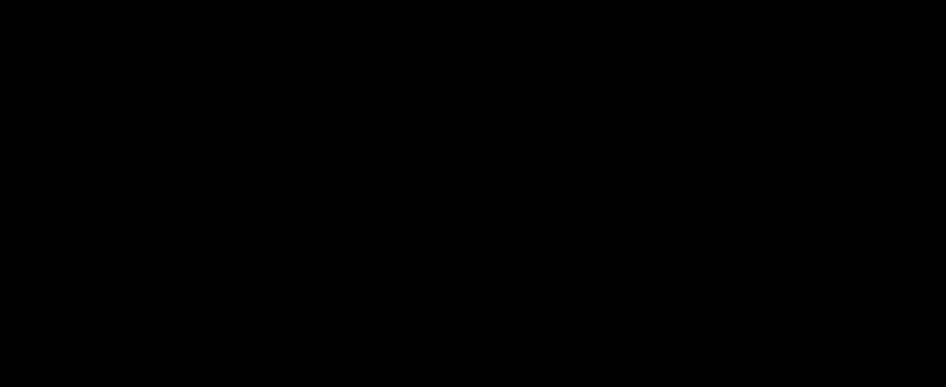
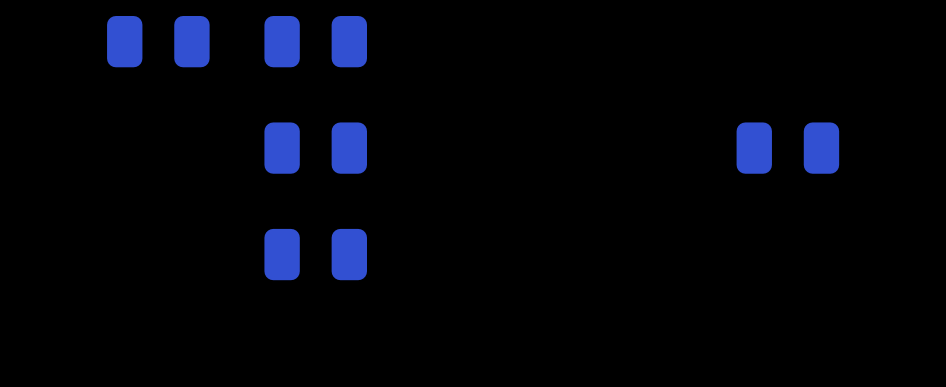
part: none -> (158, 41)
part: none -> (315, 41)
part: none -> (315, 148)
part: none -> (787, 148)
part: none -> (315, 254)

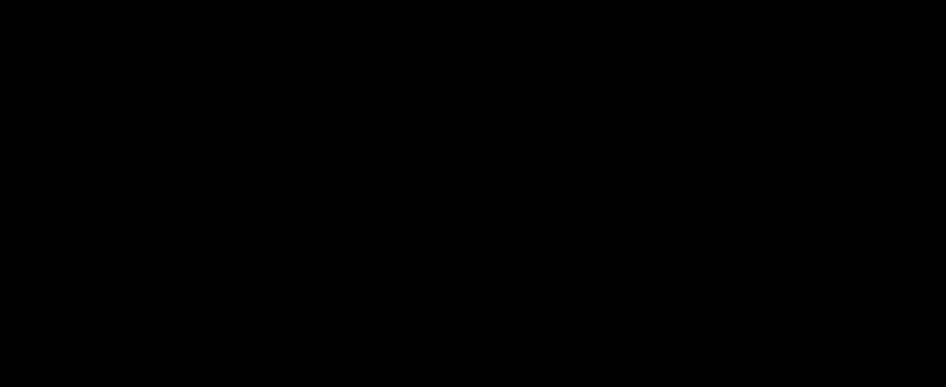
part: (158, 41) -> none
part: (315, 41) -> none
part: (315, 148) -> none
part: (787, 148) -> none
part: (315, 254) -> none

